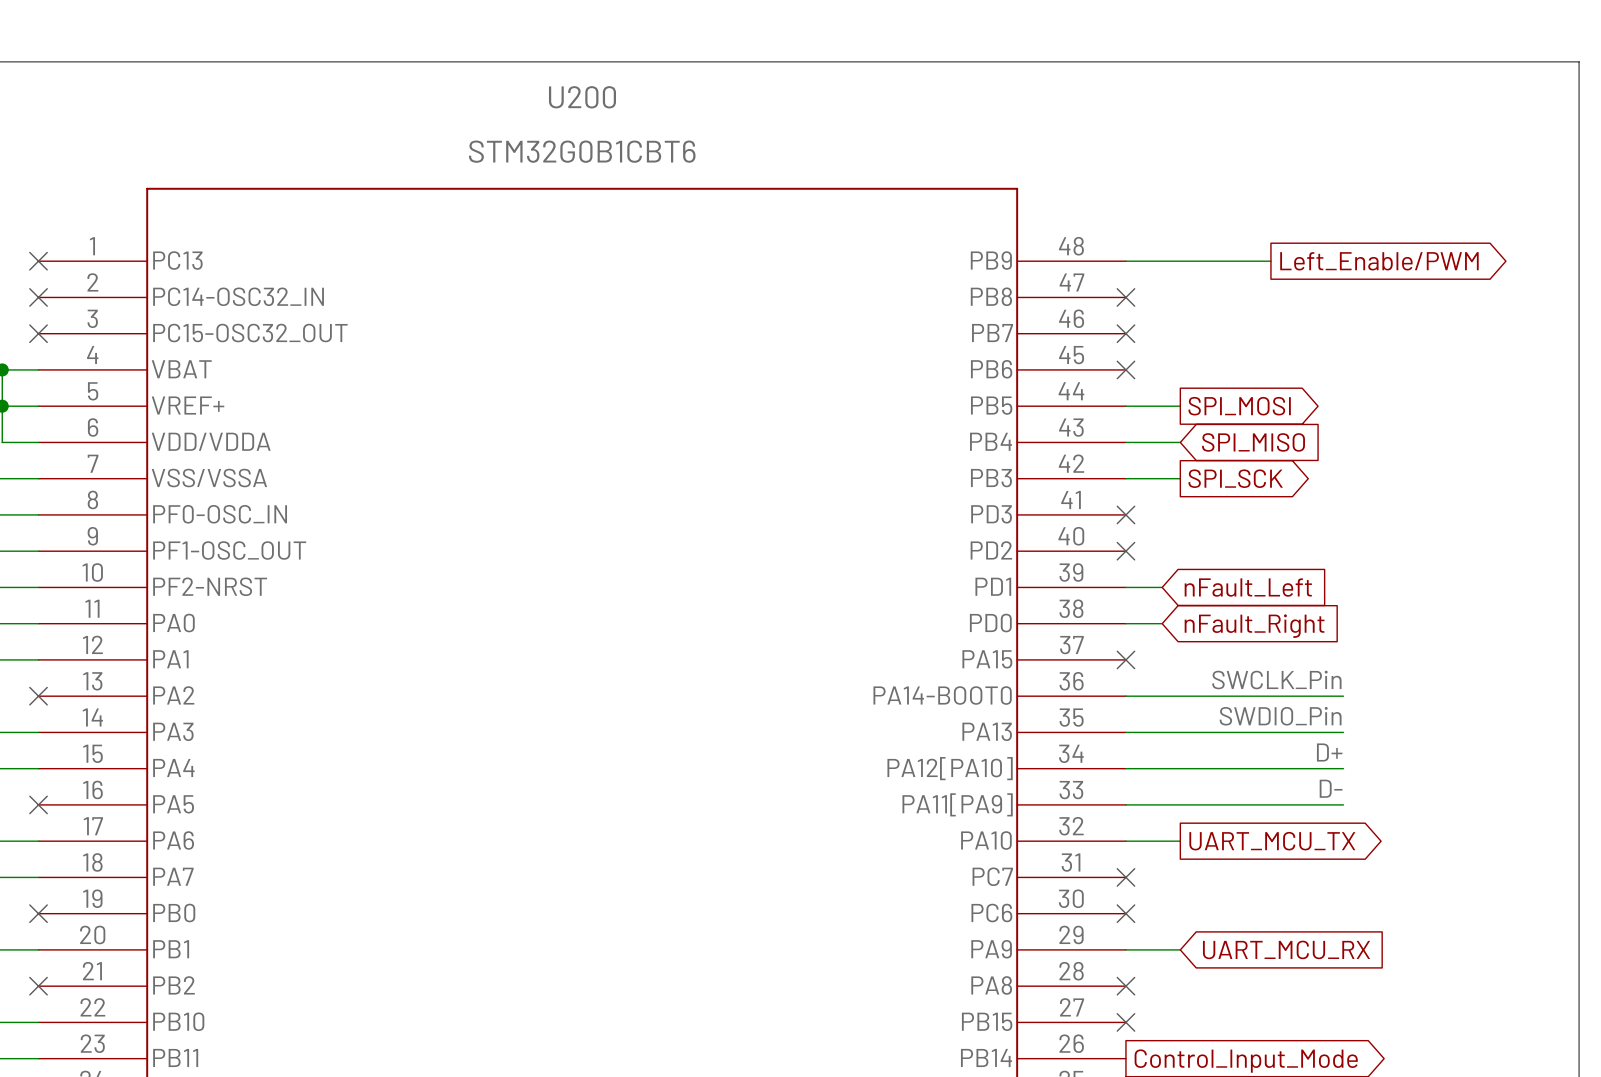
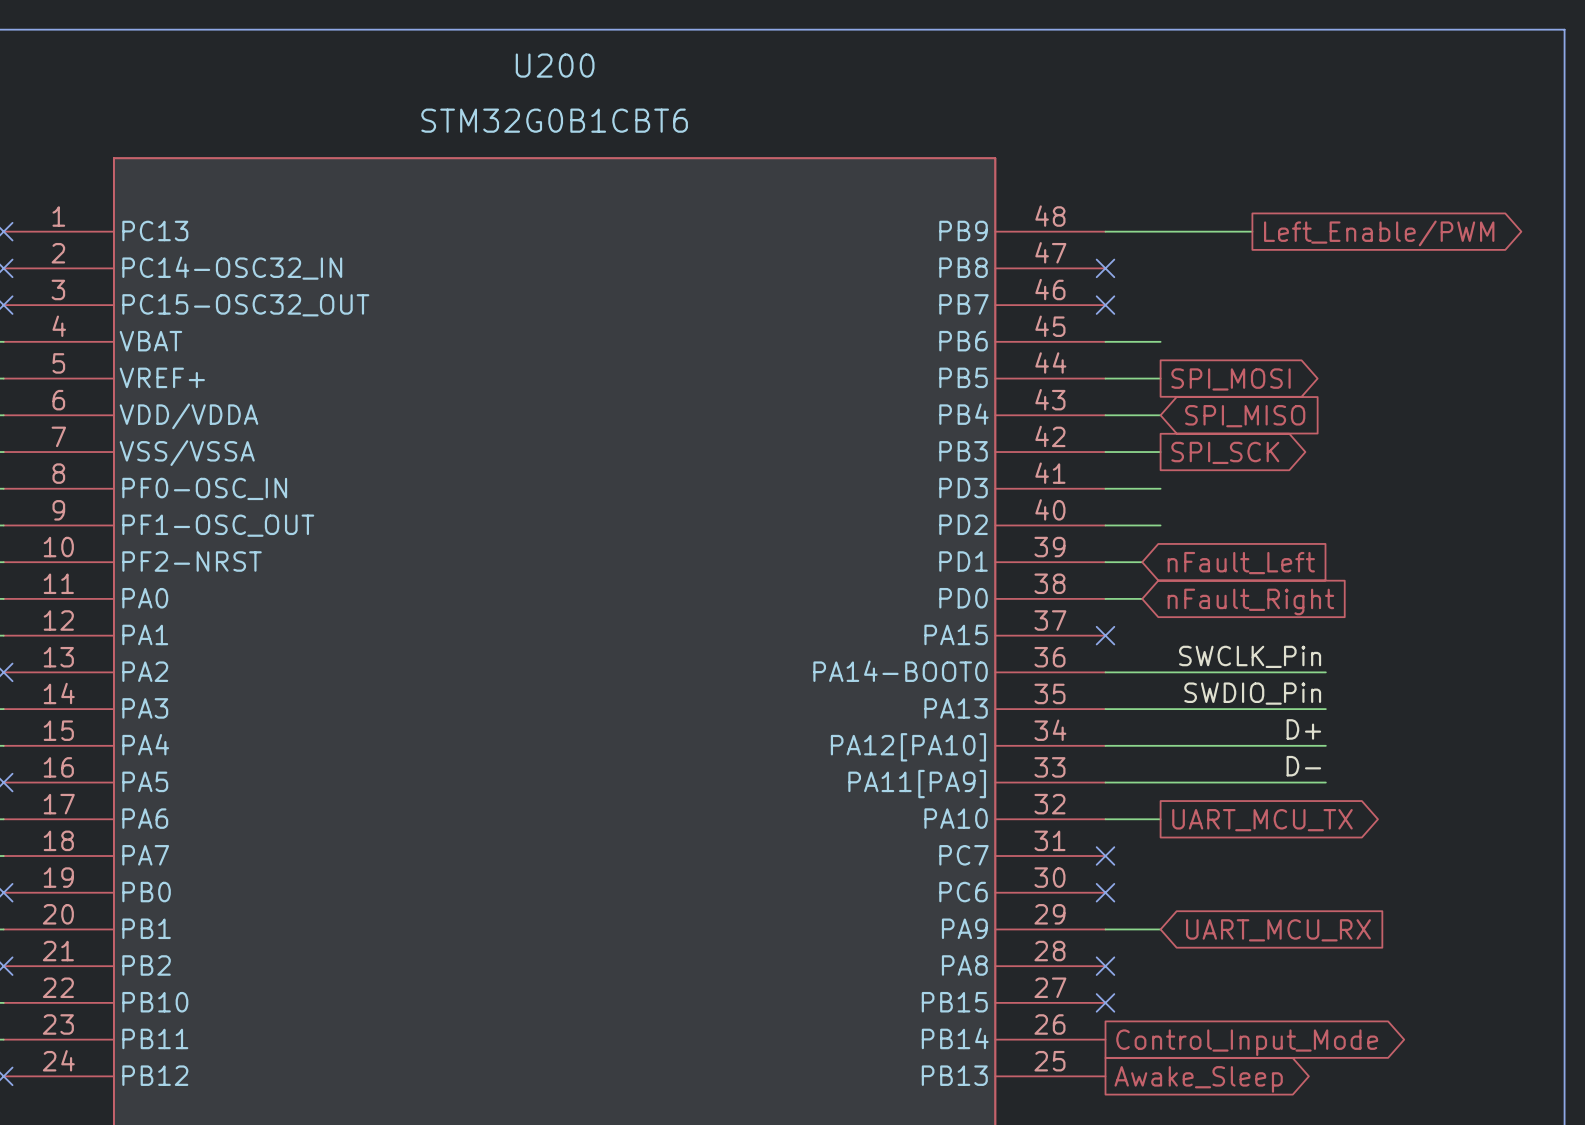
wire: none -> (1105, 341) (1160, 341)
no-connect mark: (1125, 369) -> none
wire: none -> (1105, 488) (1160, 488)
no-connect mark: (1125, 514) -> none
wire: none -> (1105, 525) (1160, 525)
no-connect mark: (1125, 551) -> none

